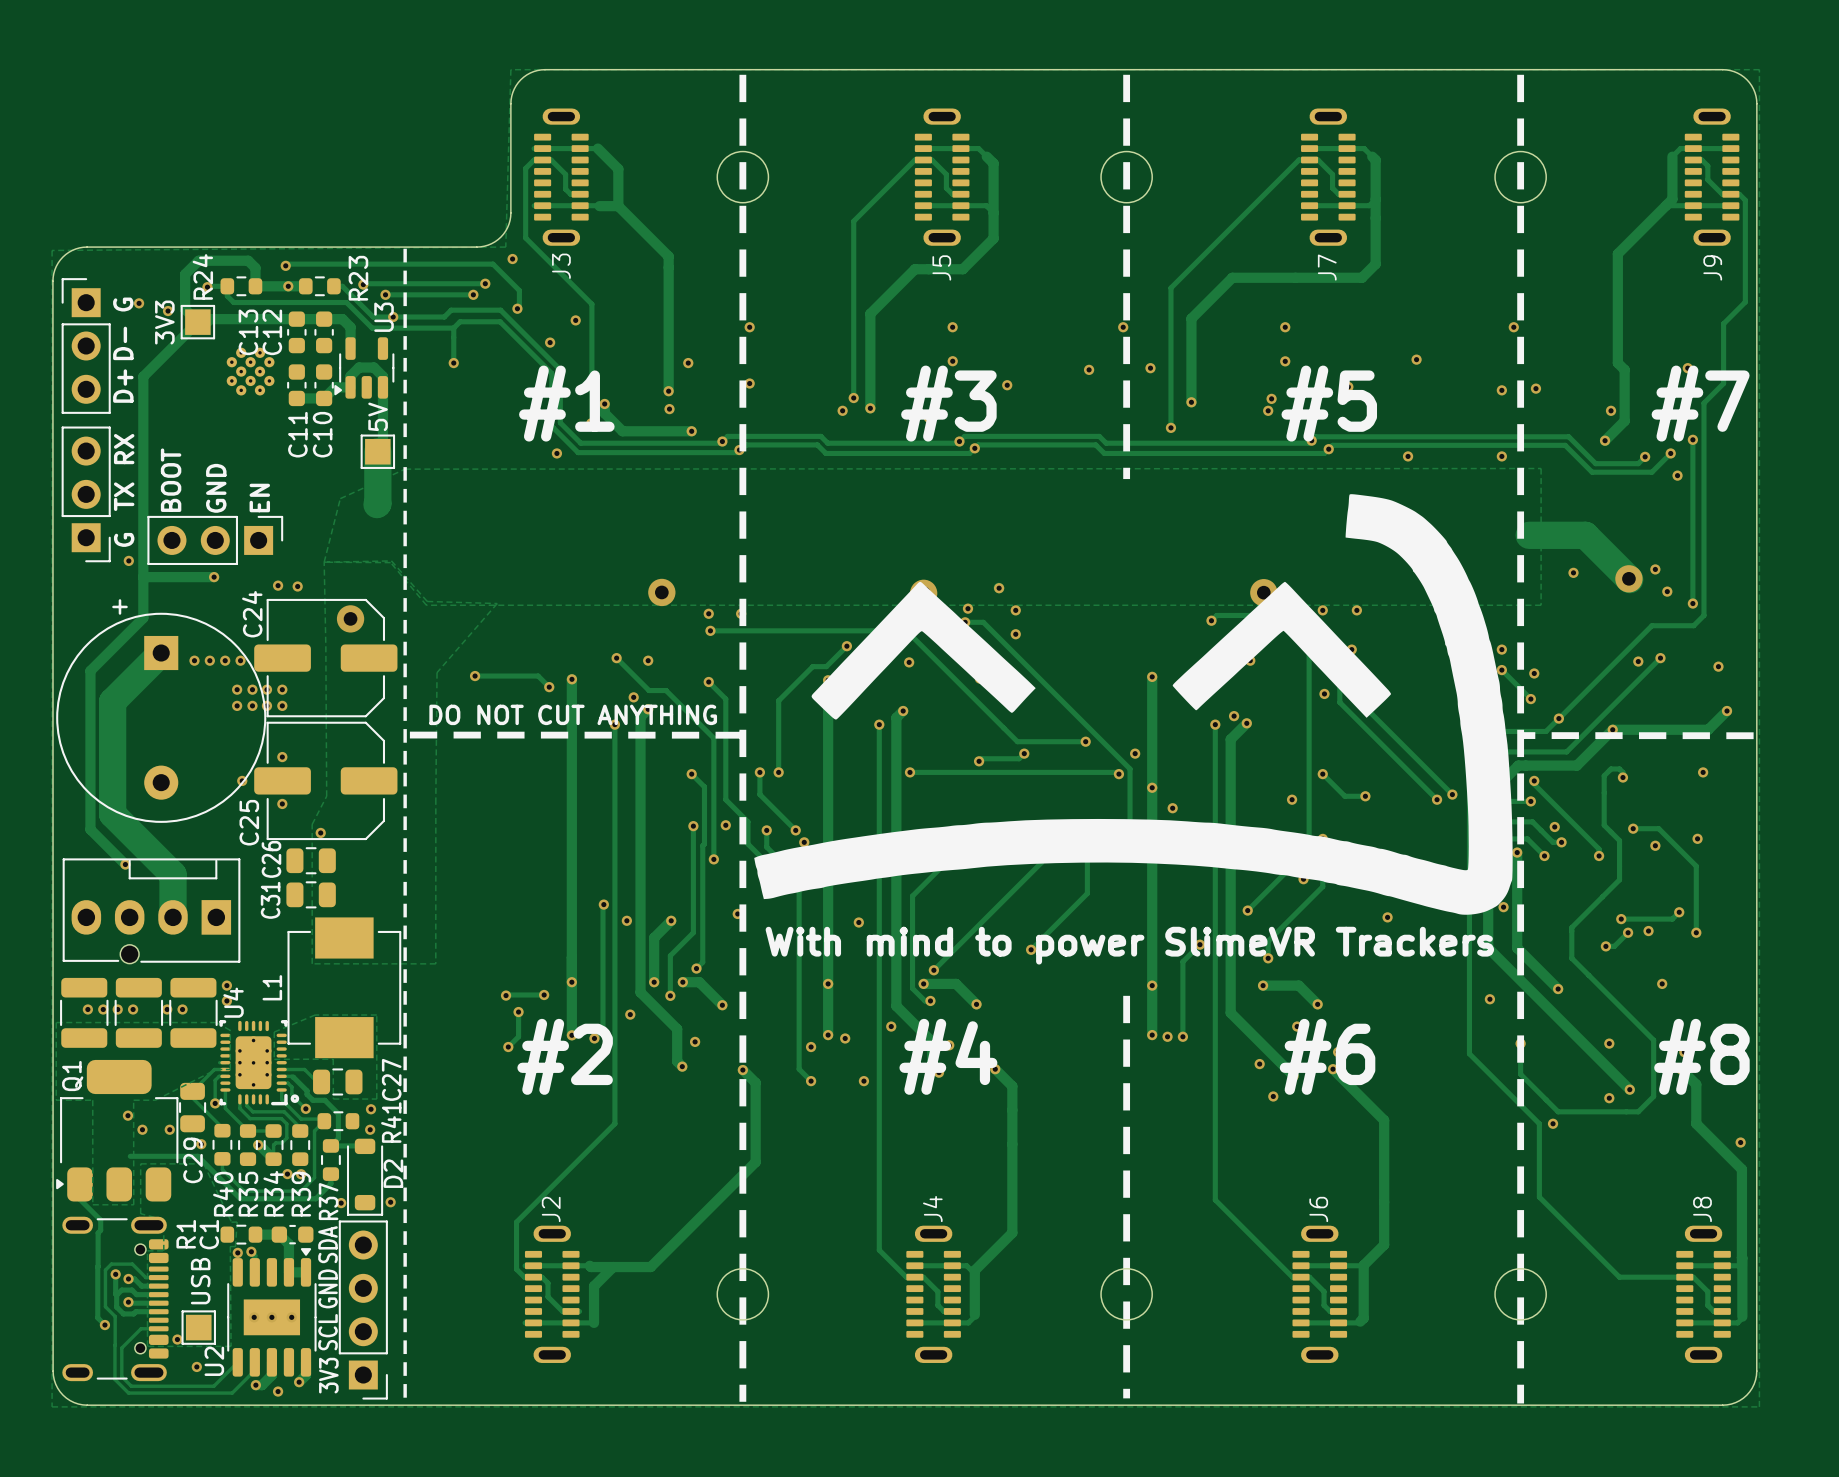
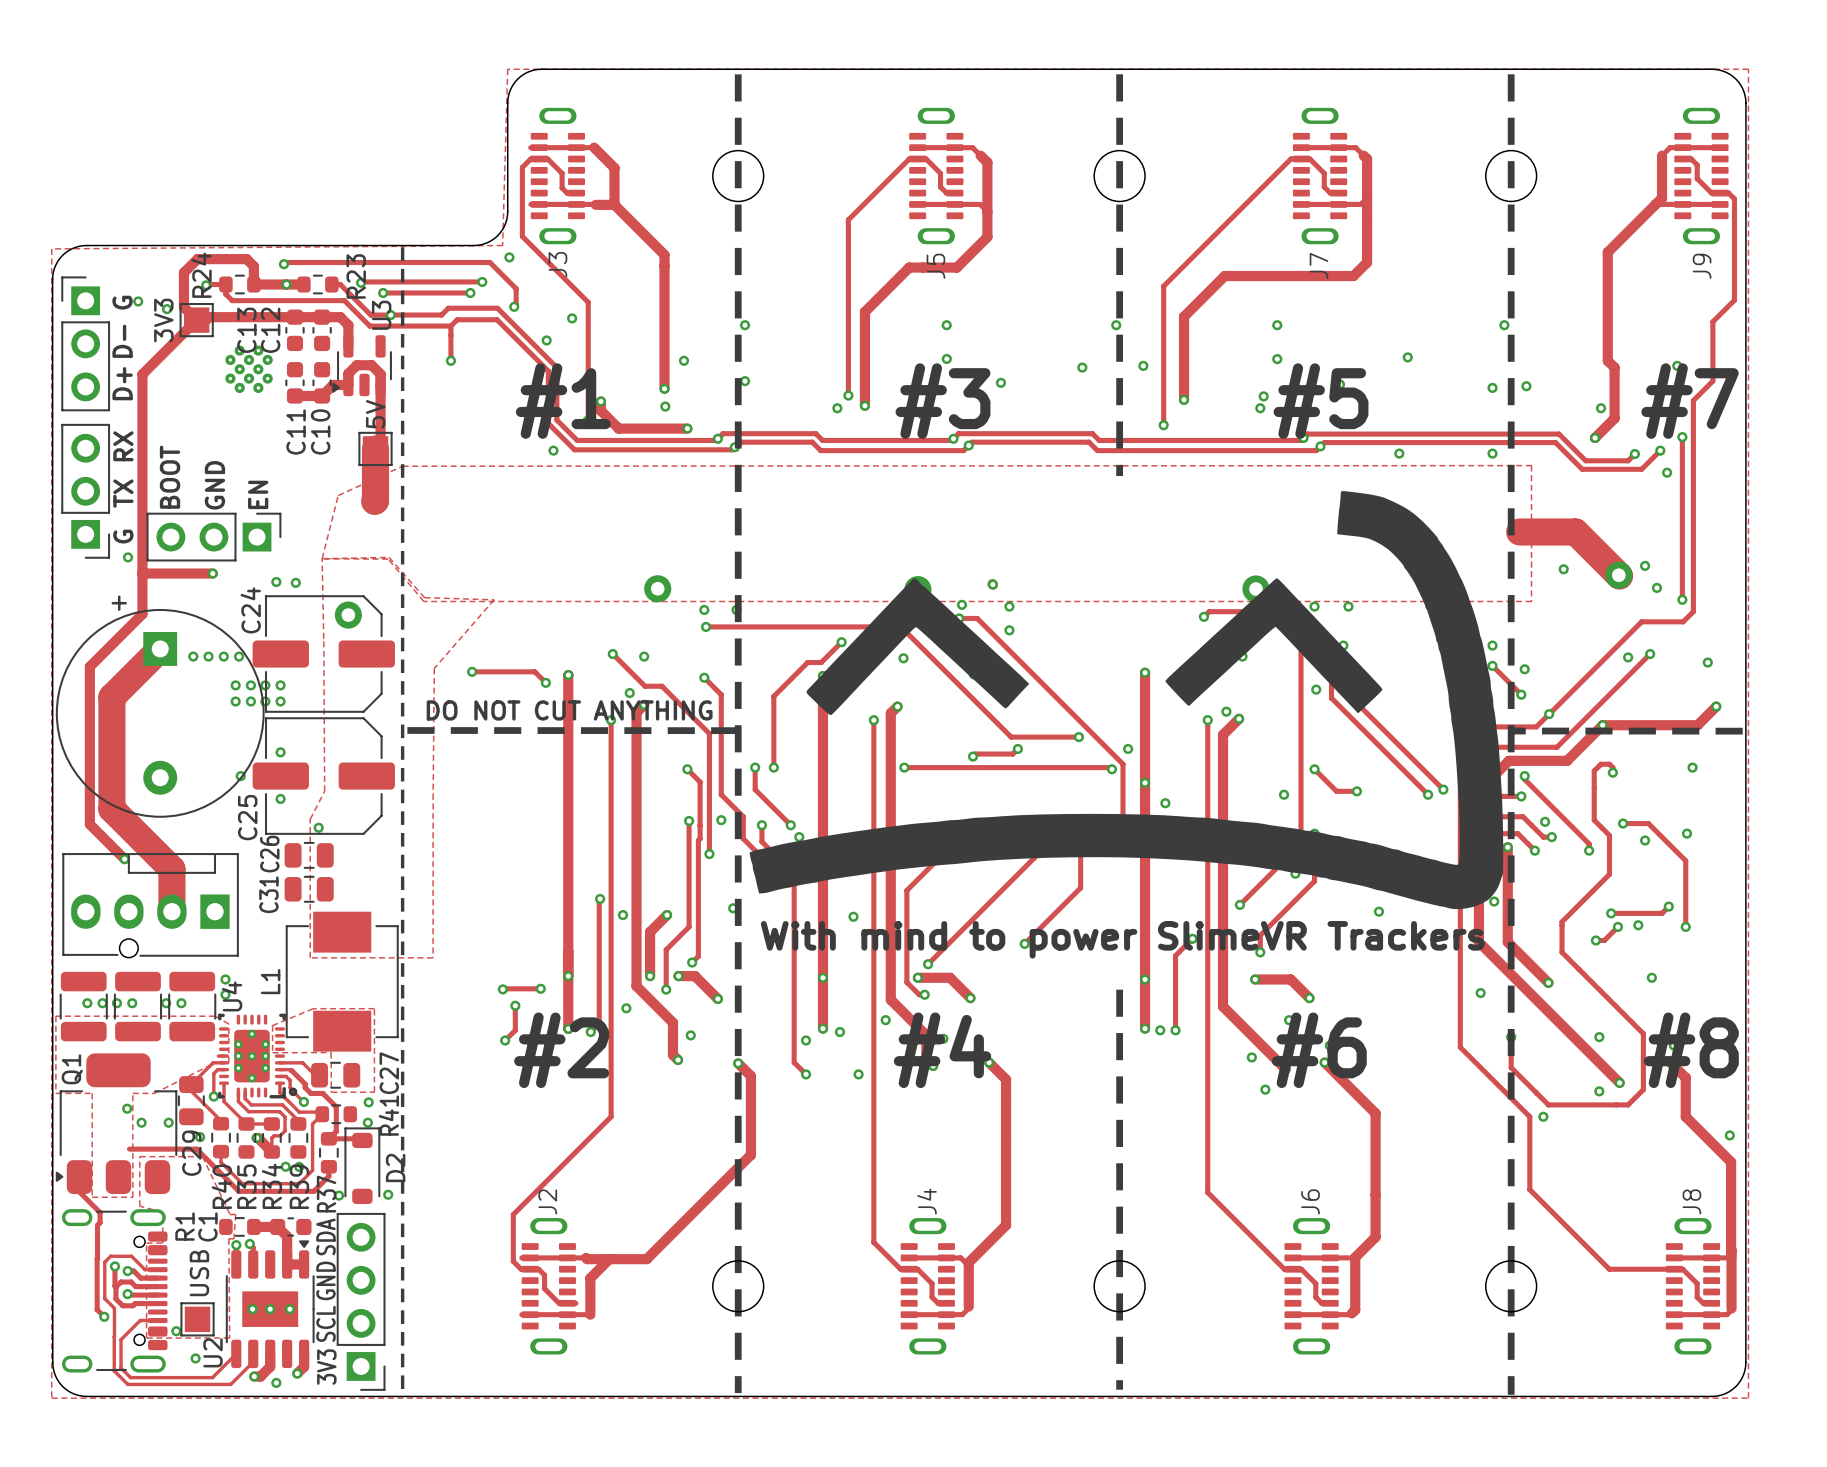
D2 rotation: 0° (365, 1177) -> 180° (362, 1165)

